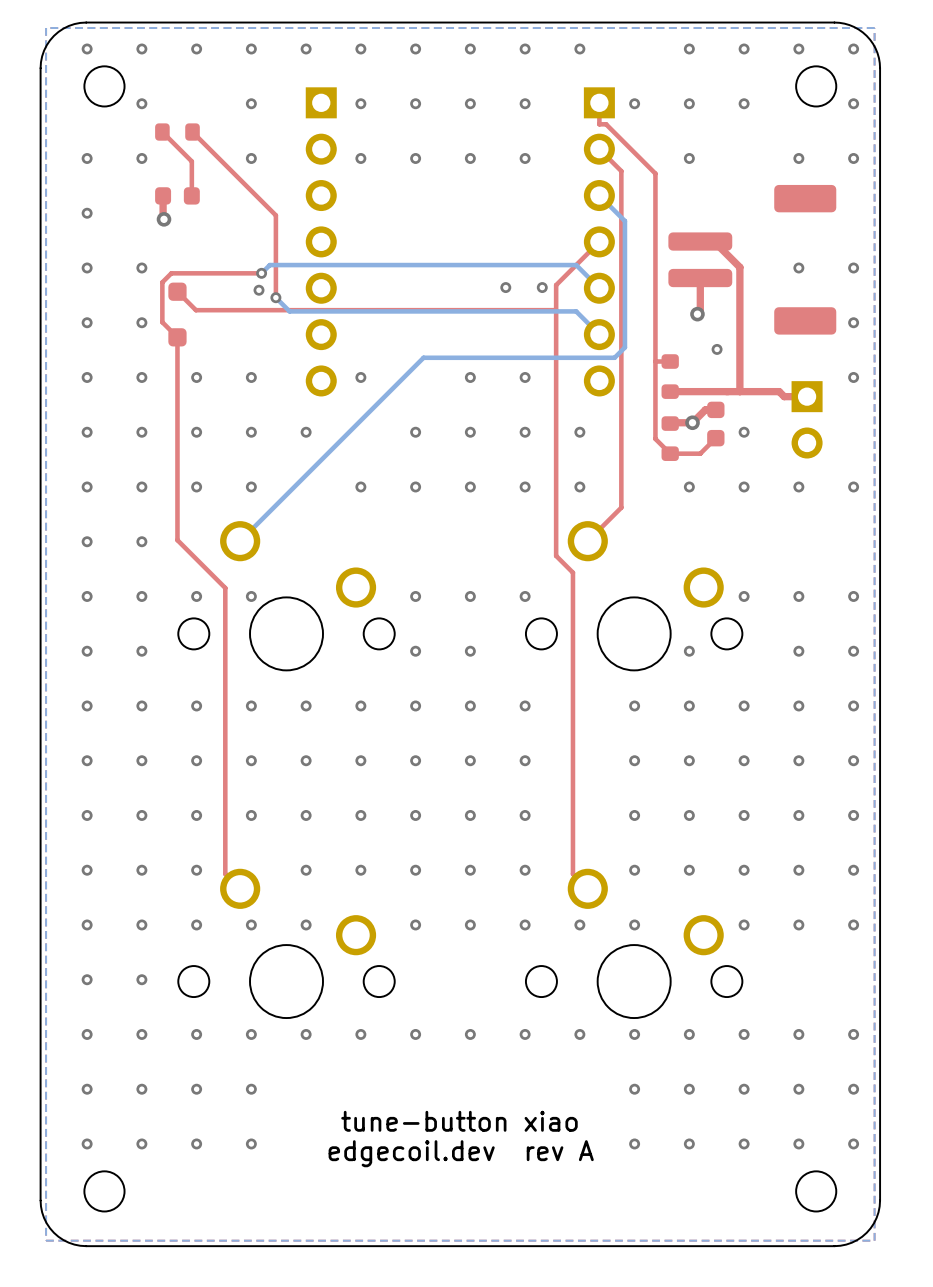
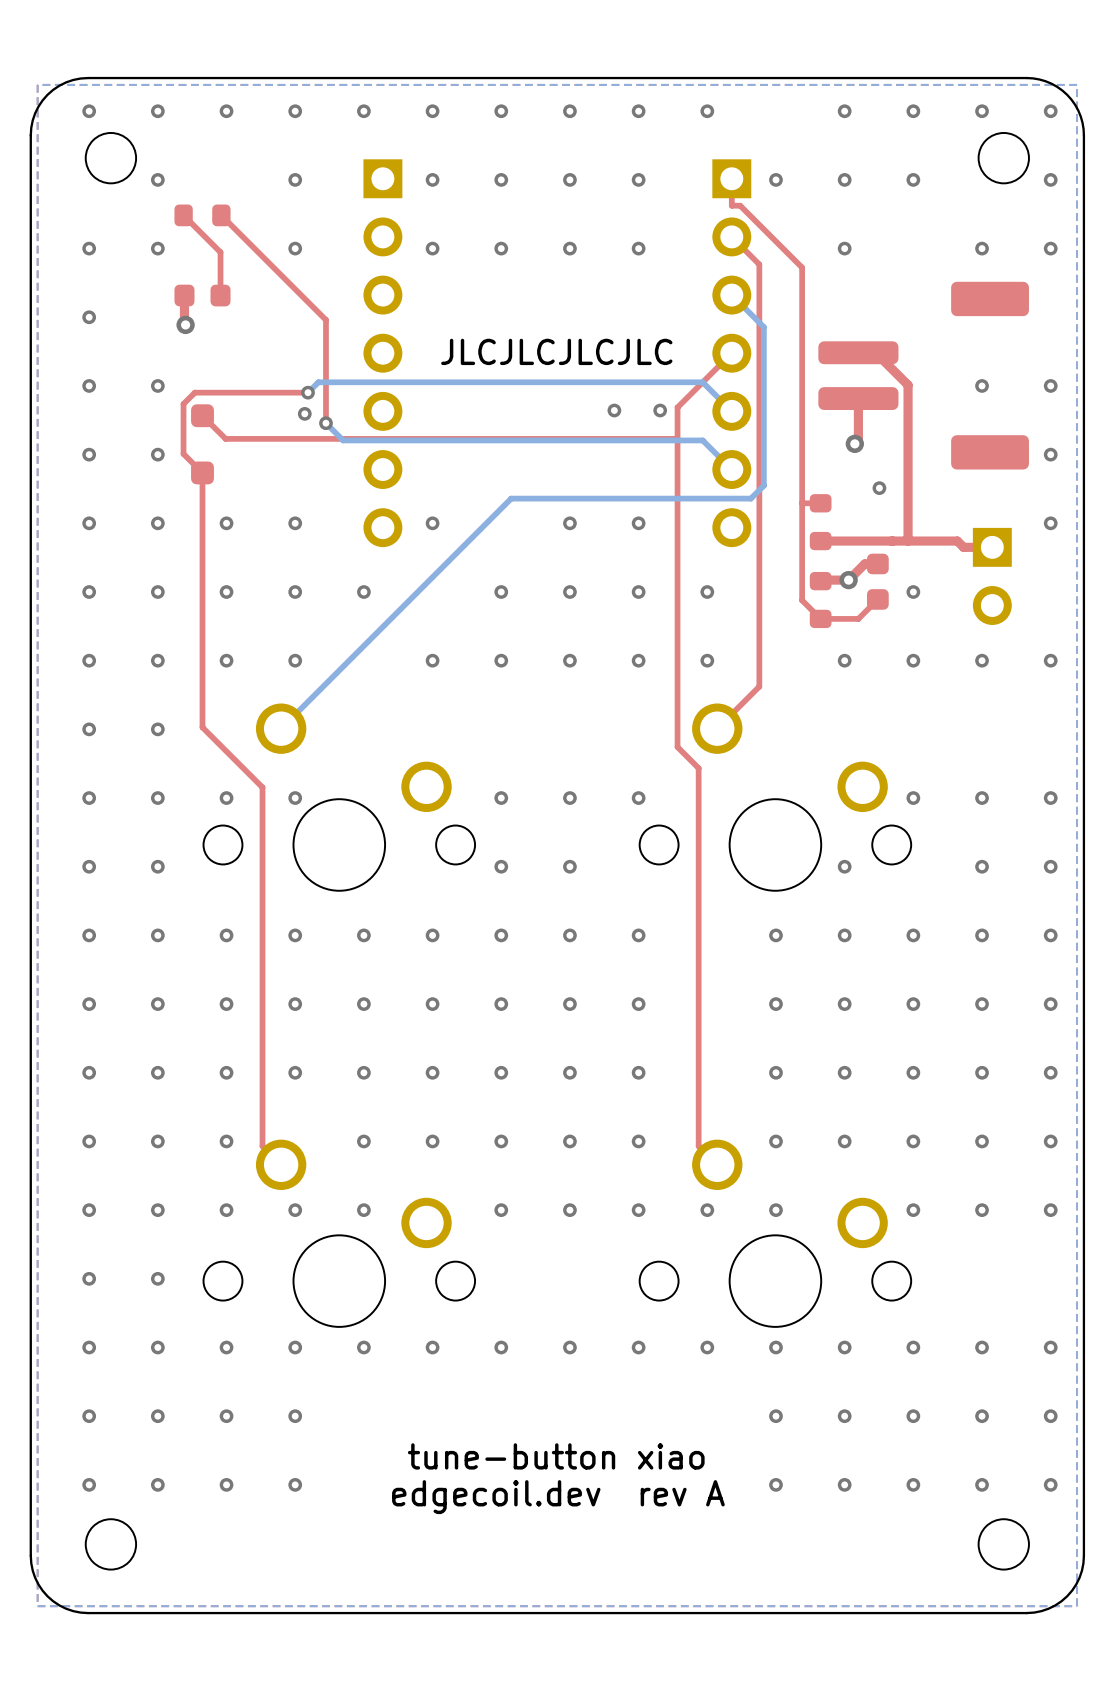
text: none -> JLCJLCJLCJLC (556, 351)

